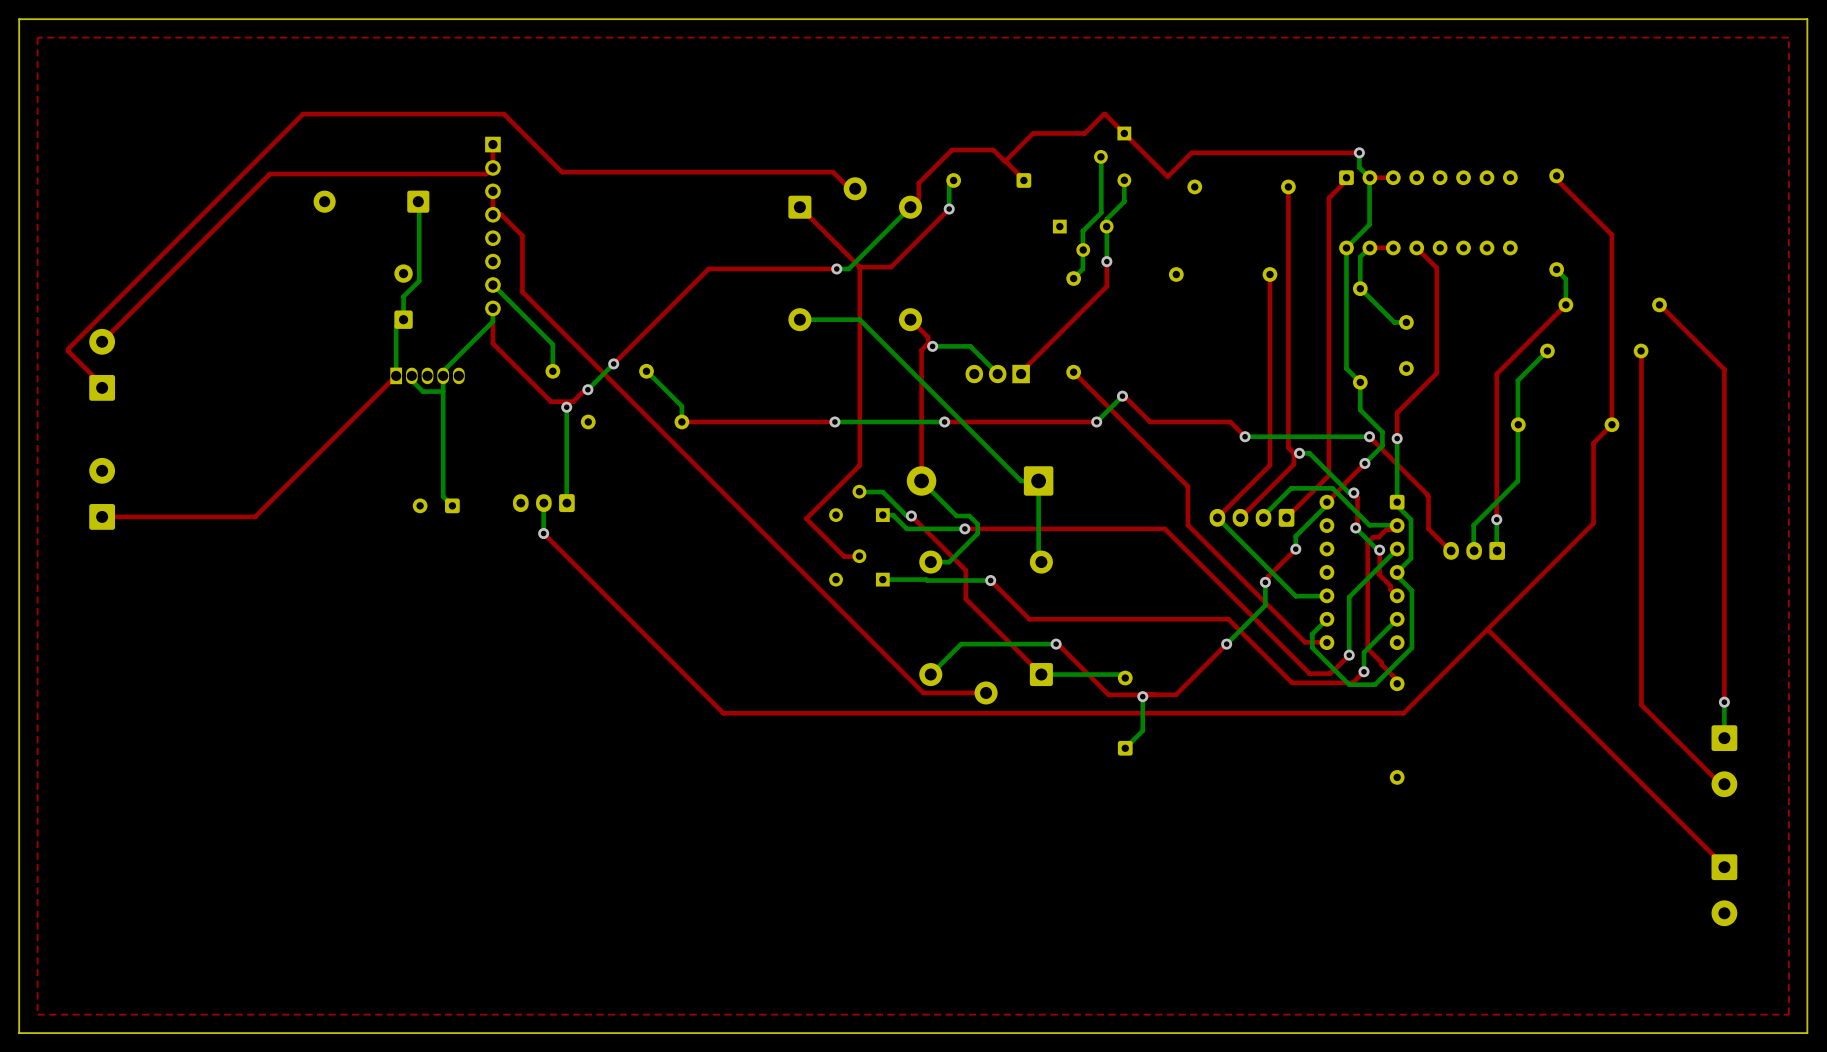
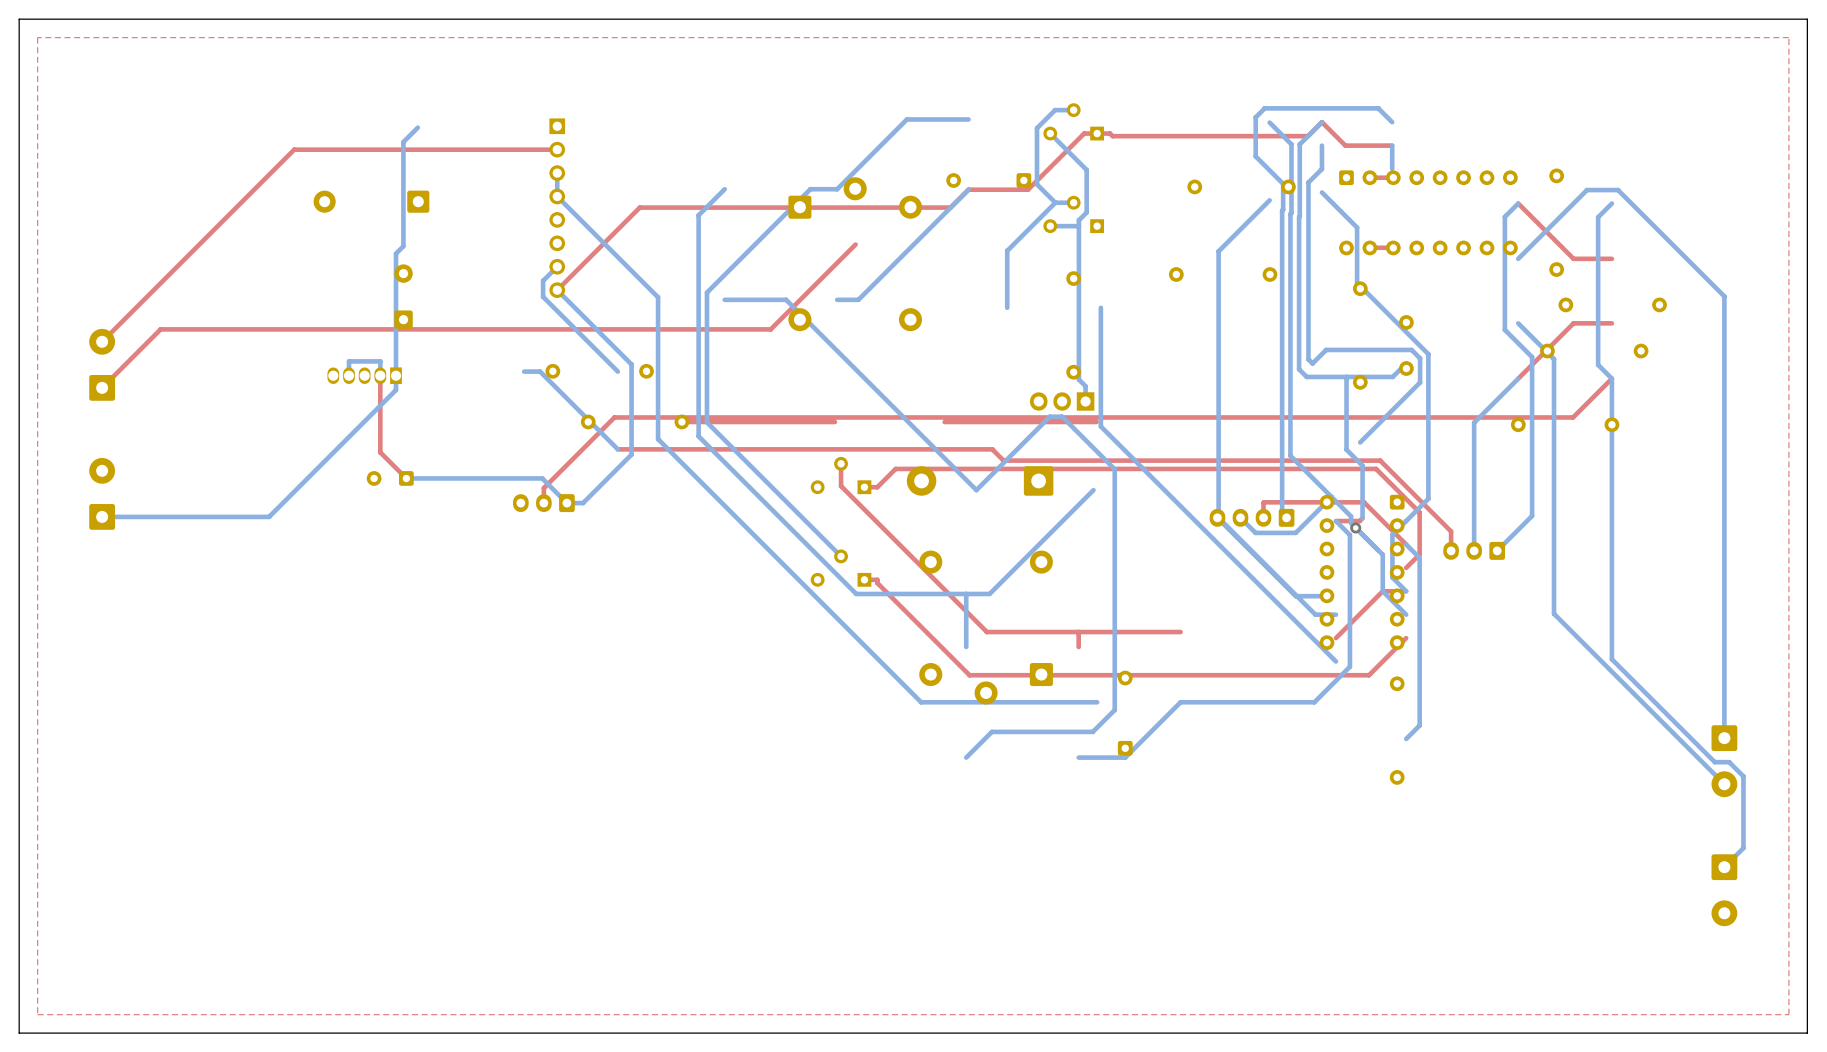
bottom track: none -> (1073, 110) (1055, 110) (1036, 128) (1036, 184) (1055, 202)
bottom track: none -> (968, 119) (906, 119) (837, 189) (810, 189) (706, 292) (706, 422) (841, 556)
part: none -> (1073, 121)
bottom track: none -> (1269, 122) (1291, 144) (1290, 455) (1351, 516) (1351, 523) (1382, 554) (1382, 591) (1406, 614)
bottom track: none -> (1321, 122) (1299, 144) (1299, 369) (1306, 376) (1392, 376) (1406, 363)
bottom track: none -> (1392, 122) (1378, 108) (1264, 108) (1255, 117) (1255, 156) (1283, 183) (1282, 513) (1286, 517)
bottom track: none -> (417, 127) (403, 142) (403, 246) (396, 253) (396, 390) (269, 516) (102, 516)
bottom track: none -> (1050, 133) (1086, 169) (1086, 212) (1078, 220) (1078, 379) (1085, 386) (1085, 401)
top track: (492, 144) (492, 167) (486, 174) (269, 174) -> (557, 149) (294, 149) (269, 174)
bottom track: none -> (1321, 145) (1321, 169) (1308, 182) (1308, 359) (1312, 363) (1326, 349) (1411, 349) (1420, 358) (1420, 382) (1360, 442)
top track: none -> (1392, 145) (1345, 145) (1321, 122) (1308, 136) (1112, 136) (1110, 133) (1084, 133) (1028, 189) (968, 189) (950, 207) (639, 207) (557, 290)
bottom track: none -> (1392, 145) (1392, 169)
top track: (1359, 152) (1191, 152) (1167, 176) (1104, 114) (1084, 133) (1033, 133) (1005, 161) -> none
bottom track: (1359, 152) (1359, 167) (1369, 177) (1369, 224) (1346, 247) (1346, 368) (1360, 382) (1360, 409) (1382, 432) (1382, 445) (1364, 463) -> none
via: (1359, 152) -> none
bottom track: (1101, 156) (1101, 212) (1082, 231) (1082, 268) (1073, 278) -> none
part: (1112, 156) -> none
top track: (1005, 161) (1023, 179) -> none
top track: (1005, 161) (993, 150) (951, 150) (918, 183) (918, 198) (910, 207) -> none
bottom track: none -> (557, 173) (557, 196) (658, 297) (658, 439) (921, 702) (1097, 702)
top track: (1556, 175) (1556, 179) (1611, 234) (1611, 424) (1593, 443) (1593, 523) (1403, 713) (723, 713) (545, 535) -> none
bottom track: (953, 180) (949, 185) (949, 209) -> none
bottom track: (1124, 180) (1124, 201) (1106, 219) (1106, 261) -> none
top track: (1346, 180) (1328, 197) (1328, 475) (1286, 517) -> none
top track: (1288, 186) (1288, 447) (1293, 453) (1293, 464) (1240, 517) -> none
bottom track: none -> (724, 189) (698, 215) (698, 436) (856, 593) (989, 593) (1093, 490)
bottom track: none -> (968, 189) (858, 299) (837, 299)
top track: (851, 190) (833, 172) (562, 172) (504, 114) (303, 114) (68, 349) (102, 385) -> none
top track: (492, 191) (492, 214) (501, 214) (522, 235) (522, 292) (923, 692) (986, 692) -> none
bottom track: none -> (1321, 192) (1357, 227) (1357, 282) (1428, 354) (1428, 498) (1392, 534) (1392, 577) (1406, 591)
bottom track: none -> (1269, 200) (1218, 251) (1218, 517) (1315, 614) (1335, 614)
bottom track: (419, 202) (419, 280) (403, 296) (403, 319) (396, 327) (396, 375) -> none
bottom track: none -> (1055, 202) (1007, 250) (1007, 307)
bottom track: none -> (1073, 202) (1055, 202)
top track: none -> (1518, 203) (1573, 258) (1611, 258)
bottom track: none -> (1518, 203) (1504, 216) (1504, 329) (1532, 357) (1532, 515) (1497, 550)
bottom track: none -> (1611, 203) (1598, 217) (1598, 364) (1611, 378) (1611, 659) (1714, 762) (1729, 762) (1743, 776) (1743, 848) (1724, 867)
top track: (799, 207) (859, 267) -> none
bottom track: (910, 207) (848, 268) (836, 268) -> none
top track: (949, 209) (891, 267) (859, 267) -> none
via: (949, 209) -> none
part position: (492, 226) -> (557, 208)
bottom track: none -> (1078, 226) (1050, 226)
part rotation: 0° (1083, 238) -> 180° (1073, 214)
top track: none -> (855, 244) (770, 329) (160, 329) (102, 387)
bottom track: (1369, 247) (1360, 256) (1360, 288) (1394, 322) (1406, 322) -> none
top track: (1416, 247) (1436, 268) (1436, 373) (1397, 412) (1397, 438) -> none
bottom track: none -> (1518, 258) (1587, 190) (1618, 190) (1724, 296) (1724, 702)
top track: (1106, 261) (1106, 286) (1021, 372) -> none
via: (1106, 261) -> none
bottom track: none -> (557, 266) (543, 280) (543, 296) (617, 371)
top track: (859, 267) (859, 465) (806, 518) (844, 556) (856, 556) -> none
top track: (834, 268) (708, 268) (613, 363) -> none
via: (836, 268) -> none
bottom track: (1556, 269) (1565, 279) (1565, 304) -> none
top track: (1269, 274) (1269, 465) (1217, 517) -> none
bottom track: (492, 284) (552, 344) (552, 371) -> none
bottom track: none -> (557, 290) (631, 364) (631, 454) (583, 503) (566, 503) (542, 478) (406, 478)
bottom track: none -> (724, 299) (786, 299) (976, 490) (1049, 416) (1062, 416) (1114, 469) (1114, 710) (1092, 731) (991, 731) (966, 757)
top track: (1565, 304) (1496, 374) (1496, 519) -> none
top track: (1659, 304) (1724, 369) (1724, 702) -> none
bottom track: none -> (1100, 307) (1100, 426) (1335, 661)
top track: (492, 308) (492, 343) (551, 401) (573, 401) (585, 389) -> none
bottom track: (492, 308) (492, 321) (443, 371) (443, 496) (452, 505) -> none
bottom track: (799, 319) (859, 319) (1021, 480) (1038, 480) (1038, 559) -> none
top track: (910, 319) (928, 337) (928, 343) -> none
bottom track: none -> (1518, 323) (1554, 359) (1554, 613) (1724, 784)
top track: none -> (1611, 323) (1573, 323) (1518, 378)
top track: (928, 343) (921, 350) (921, 476) -> none
bottom track: (932, 346) (970, 346) (998, 374) -> none
via: (932, 346) -> none
bottom track: (1547, 351) (1517, 380) (1517, 480) (1473, 525) (1473, 551) -> none
top track: (1641, 351) (1641, 704) (1720, 784) -> none
bottom track: (613, 363) (587, 389) -> none
via: (613, 363) -> none
bottom track: none -> (524, 371) (540, 371) (617, 449)
bottom track: (646, 371) (681, 406) (681, 421) -> none
top track: (1073, 372) (1187, 486) (1187, 525) (1305, 642) (1327, 642) -> none
part position: (997, 374) -> (1062, 401)
top track: none -> (380, 375) (380, 452) (406, 478)
bottom track: none -> (380, 375) (380, 361) (348, 361) (348, 375)
top track: (396, 375) (255, 516) (104, 516) -> none
bottom track: (411, 375) (411, 380) (422, 391) (443, 391) -> none
part rotation: 0° (427, 375) -> 180° (364, 375)
part position: (427, 375) -> (364, 375)
bottom track: none -> (1346, 376) (1346, 449) (1362, 465) (1362, 518)
bottom track: none -> (1518, 378) (1474, 422) (1474, 550)
top track: none -> (1611, 378) (1573, 417) (614, 417) (543, 488) (543, 503)
via: (587, 389) -> none
bottom track: (1122, 396) (1096, 421) -> none
via: (1122, 396) -> none
top track: (1124, 396) (1150, 421) (1230, 421) (1245, 436) -> none
bottom track: (566, 407) (566, 503) -> none
via: (566, 407) -> none
via: (834, 421) -> none
bottom track: (944, 421) (834, 421) -> none
via: (944, 421) -> none
via: (1096, 421) -> none
via: (1245, 436) -> none
top track: (1369, 436) (1427, 494) (1428, 528) (1450, 551) -> none
bottom track: (1369, 436) (1245, 436) -> none
via: (1369, 436) -> none
bottom track: (1397, 438) (1397, 505) (1411, 519) (1411, 558) (1397, 572) -> none
via: (1397, 438) -> none
top track: none -> (617, 449) (992, 449) (1003, 460) (1380, 460) (1451, 531) (1451, 550)
bottom track: (1299, 453) (1309, 453) (1349, 492) (1353, 492) -> none
via: (1299, 453) -> none
top track: none -> (841, 463) (841, 486) (986, 632) (1180, 632)
top track: (1364, 463) (1327, 502) -> none
via: (1364, 463) -> none
bottom track: (921, 480) (956, 515) (969, 515) (977, 524) (977, 533) (949, 562) (930, 562) -> none
top track: none -> (864, 487) (877, 487) (895, 468) (1376, 468) (1419, 512) (1419, 554) (1406, 567)
bottom track: (859, 492) (882, 492) (906, 515) (911, 515) -> none
via: (1353, 492) -> none
top track: (1355, 494) (1357, 497) (1357, 526) -> none
bottom track: none -> (1331, 497) (1295, 532) (1255, 532) (1240, 517)
bottom track: (543, 503) (543, 533) -> none
part position: (859, 503) -> (841, 475)
bottom track: (1327, 504) (1295, 536) (1295, 549) -> none
part position: (436, 505) -> (390, 478)
bottom track: (882, 515) (892, 515) (906, 528) (964, 528) -> none
top track: (911, 515) (965, 570) (965, 598) (1041, 674) -> none
via: (911, 515) -> none
bottom track: (1263, 515) (1291, 488) (1332, 488) (1369, 525) (1397, 525) -> none
top track: none -> (1263, 517) (1264, 502) (1364, 502) (1406, 544)
top track: none -> (1362, 518) (1359, 521) (1335, 521)
bottom track: (1496, 519) (1496, 551) -> none
via: (1496, 519) -> none
bottom track: none -> (1335, 521) (1349, 535) (1349, 666) (1314, 702) (1180, 702) (1125, 757) (1078, 757)
top track: (1397, 525) (1392, 529) (1386, 529) (1378, 537) (1373, 537) (1367, 542) (1367, 648) (1397, 680) -> none
top track: (964, 528) (1164, 528) (1309, 673) (1329, 673) (1349, 655) -> none
via: (964, 528) -> none
via: (543, 533) -> none
bottom track: none -> (1406, 544) (1419, 557) (1419, 725) (1406, 738)
top track: (1295, 549) (1268, 576) (1265, 582) -> none
via: (1295, 549) -> none
bottom track: (1397, 549) (1349, 597) (1349, 655) -> none
top track: (1379, 550) (1378, 574) (1390, 586) (1390, 589) (1397, 596) -> none
via: (1379, 550) -> none
part position: (859, 567) -> (841, 568)
bottom track: (1397, 575) (1411, 590) (1411, 647) (1375, 684) (1349, 684) (1312, 647) (1312, 633) (1327, 619) -> none
top track: none -> (864, 579) (877, 579) (877, 583) (969, 675) (1369, 675) (1406, 638)
bottom track: (882, 579) (990, 580) -> none
top track: (990, 580) (1029, 619) (1228, 619) (1292, 682) (1352, 682) (1364, 671) -> none
via: (990, 580) -> none
bottom track: (1265, 582) (1265, 605) (1226, 644) -> none
via: (1265, 582) -> none
top track: none -> (1406, 591) (1382, 591) (1335, 638)
bottom track: none -> (966, 593) (966, 646)
bottom track: (1397, 619) (1364, 652) (1364, 671) -> none
top track: (1487, 629) (1724, 866) -> none
top track: none -> (1078, 632) (1078, 646)
bottom track: (1056, 644) (961, 644) (930, 674) -> none
via: (1056, 644) -> none
top track: (1226, 644) (1175, 694) (1108, 694) (1057, 644) -> none
via: (1226, 644) -> none
via: (1349, 655) -> none
via: (1364, 671) -> none
bottom track: (1041, 674) (1121, 674) (1125, 678) -> none
bottom track: (1142, 696) (1142, 730) (1125, 748) -> none
via: (1142, 696) -> none
via: (1724, 702) -> none

